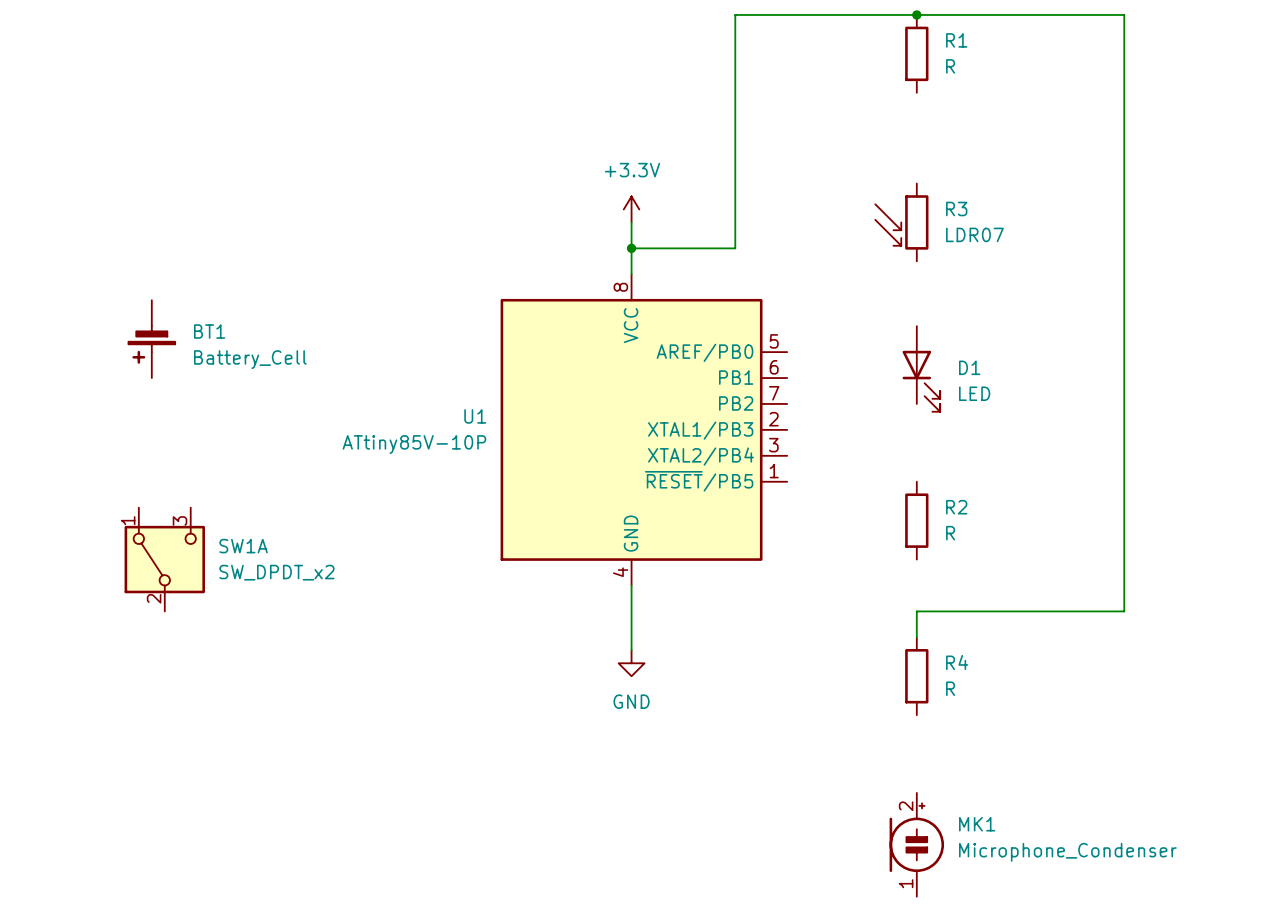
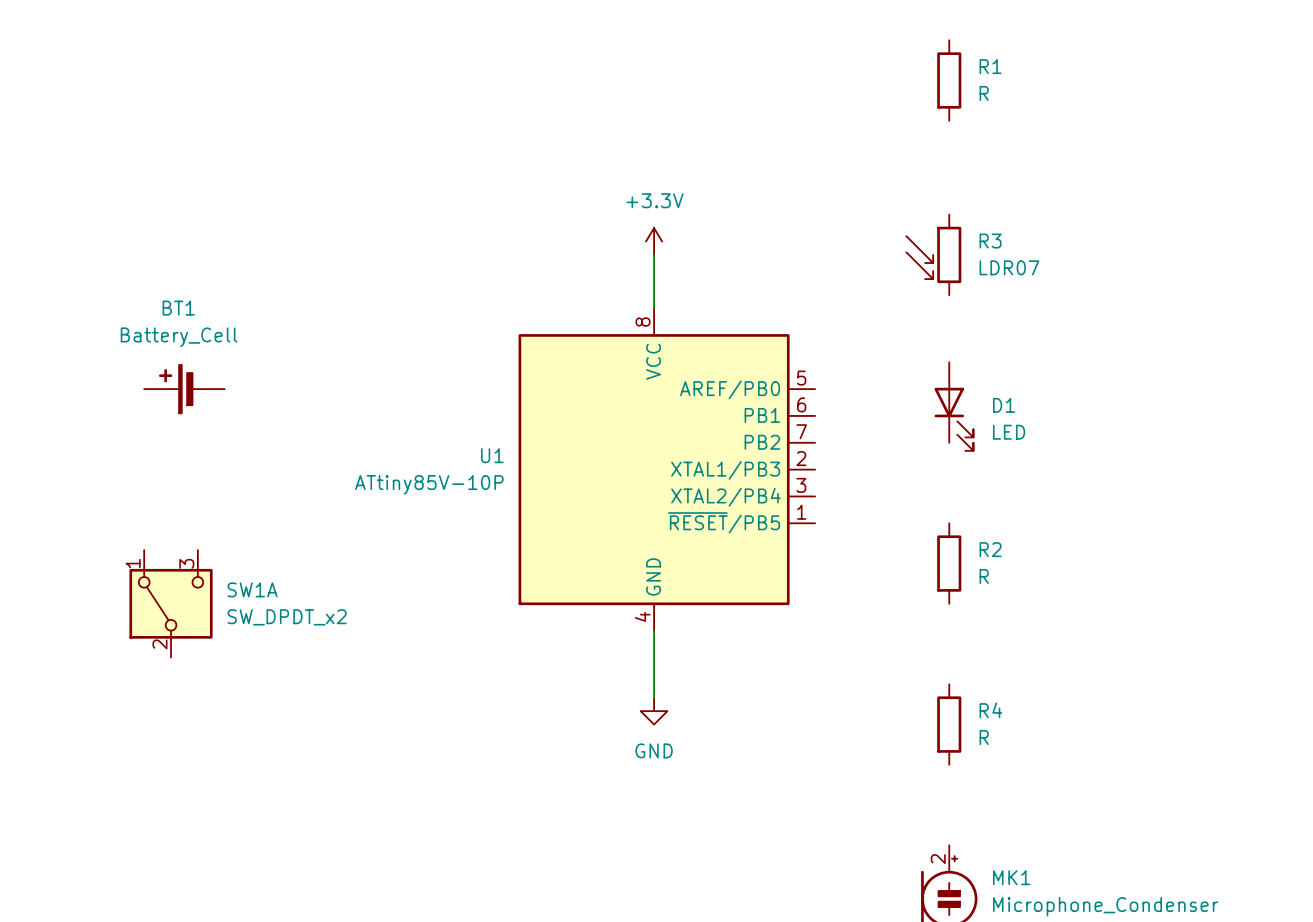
junction: (916, 14) -> none
wire: (631, 248) (735, 248) (735, 14) (1124, 14) (1124, 611) (916, 611) (916, 637) -> none
junction: (631, 248) -> none
BT1 name position: BT1 (209, 331) -> BT1 (178, 308)
BT1 rotation: 0° (151, 344) -> 90° clockwise (178, 389)
BT1 value position: Battery_Cell (250, 359) -> Battery_Cell (179, 337)

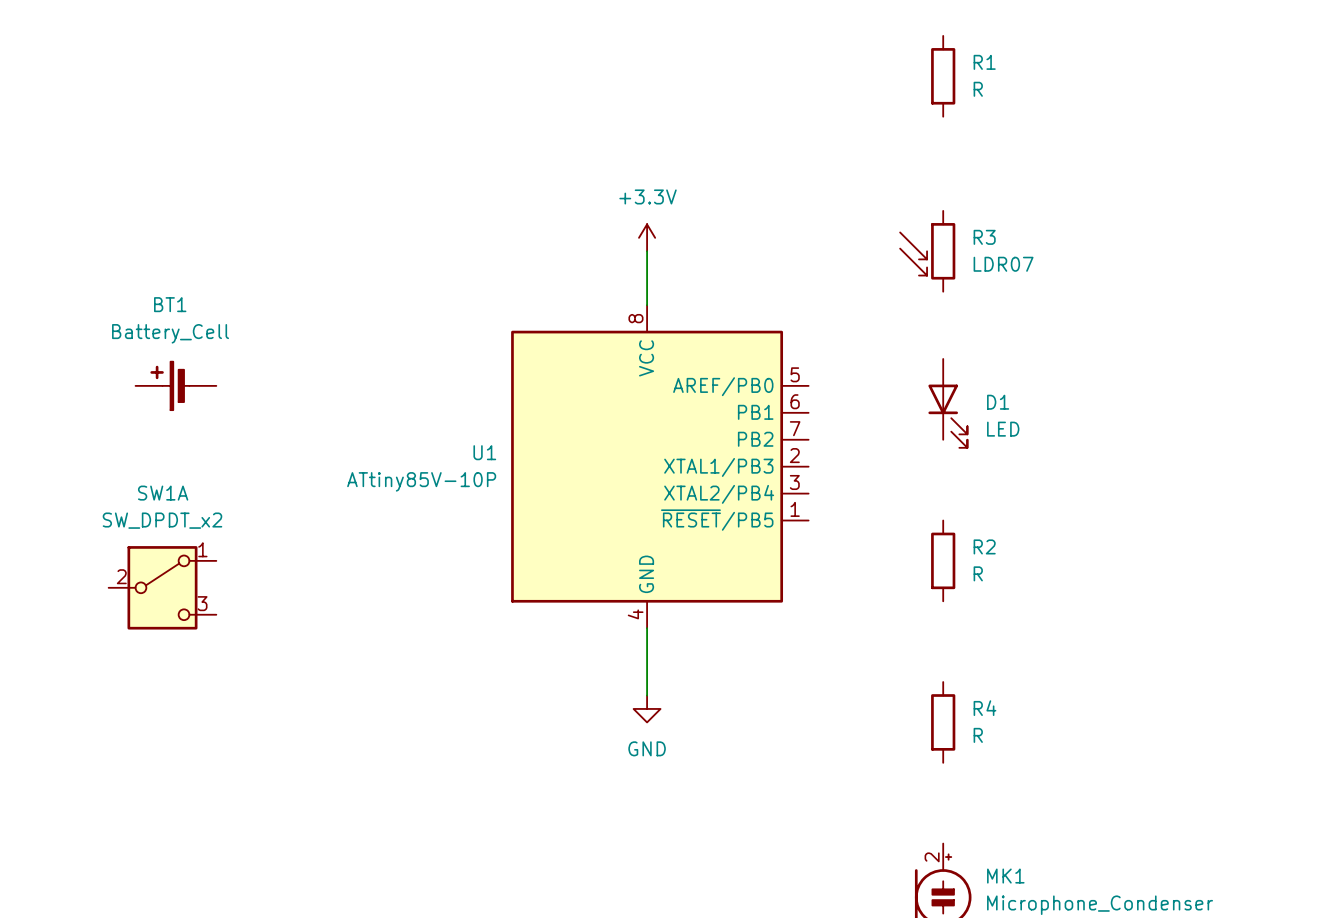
SW1A name position: SW1A (252, 589) -> SW1A (163, 493)
SW1A rotation: 0° (171, 603) -> 90° clockwise (162, 587)
SW1A value position: SW_DPDT_x2 (287, 617) -> SW_DPDT_x2 (162, 520)

